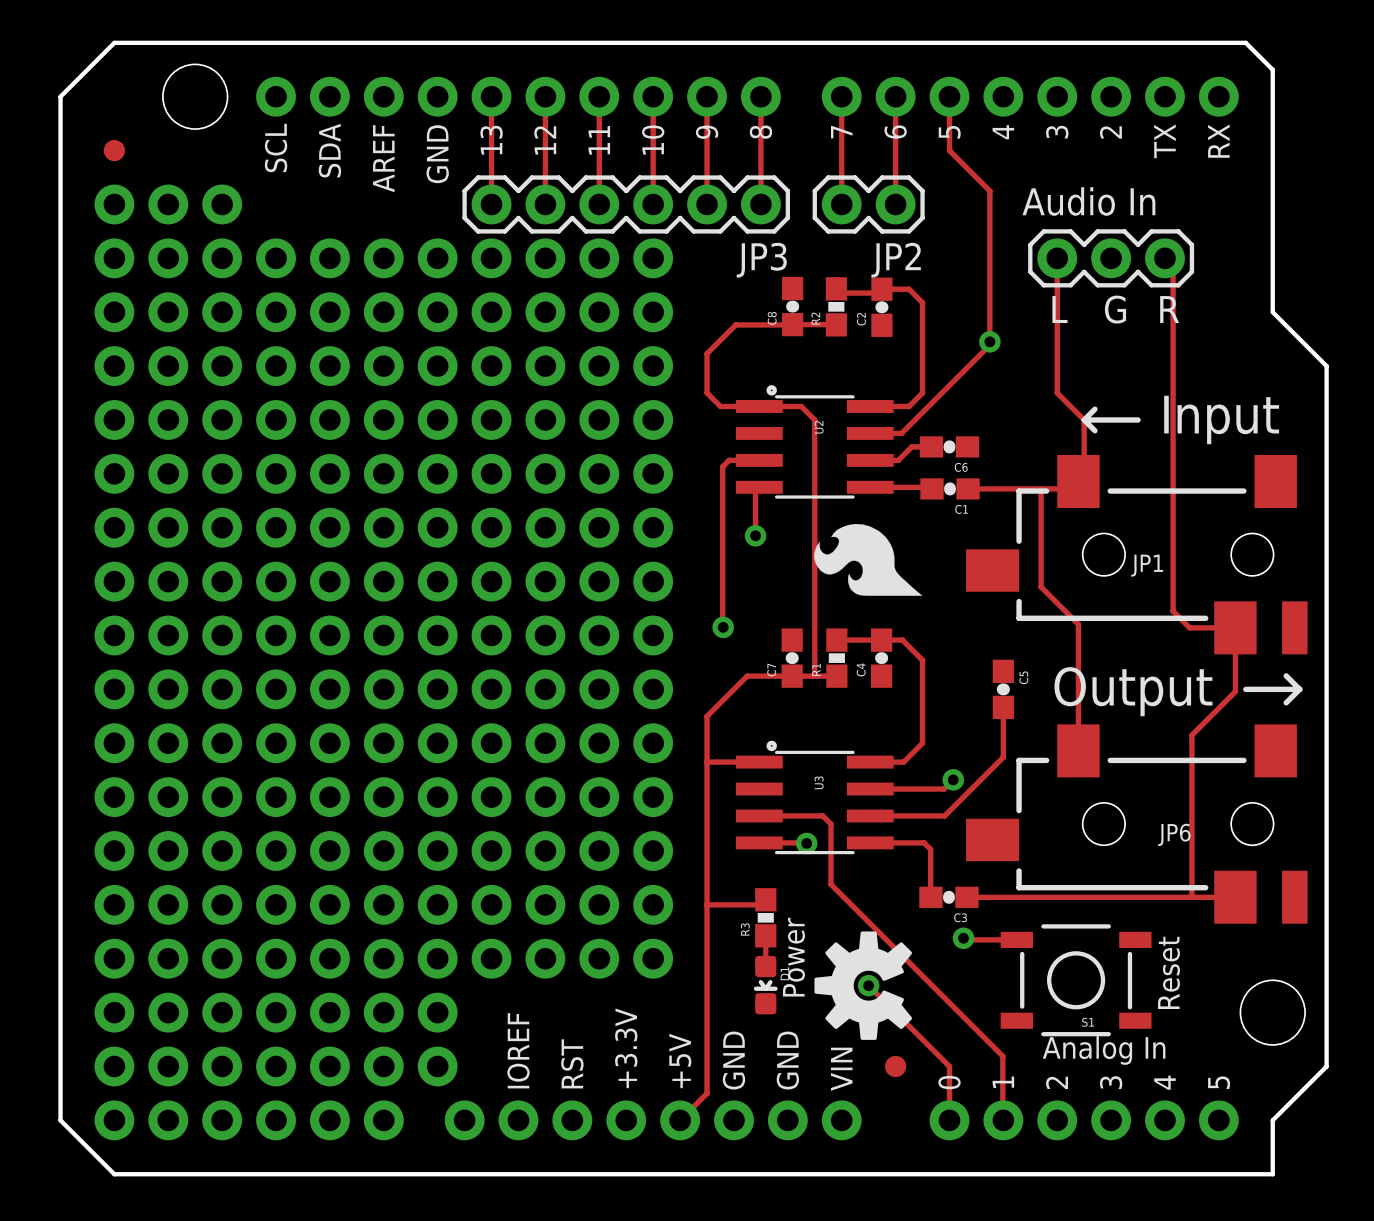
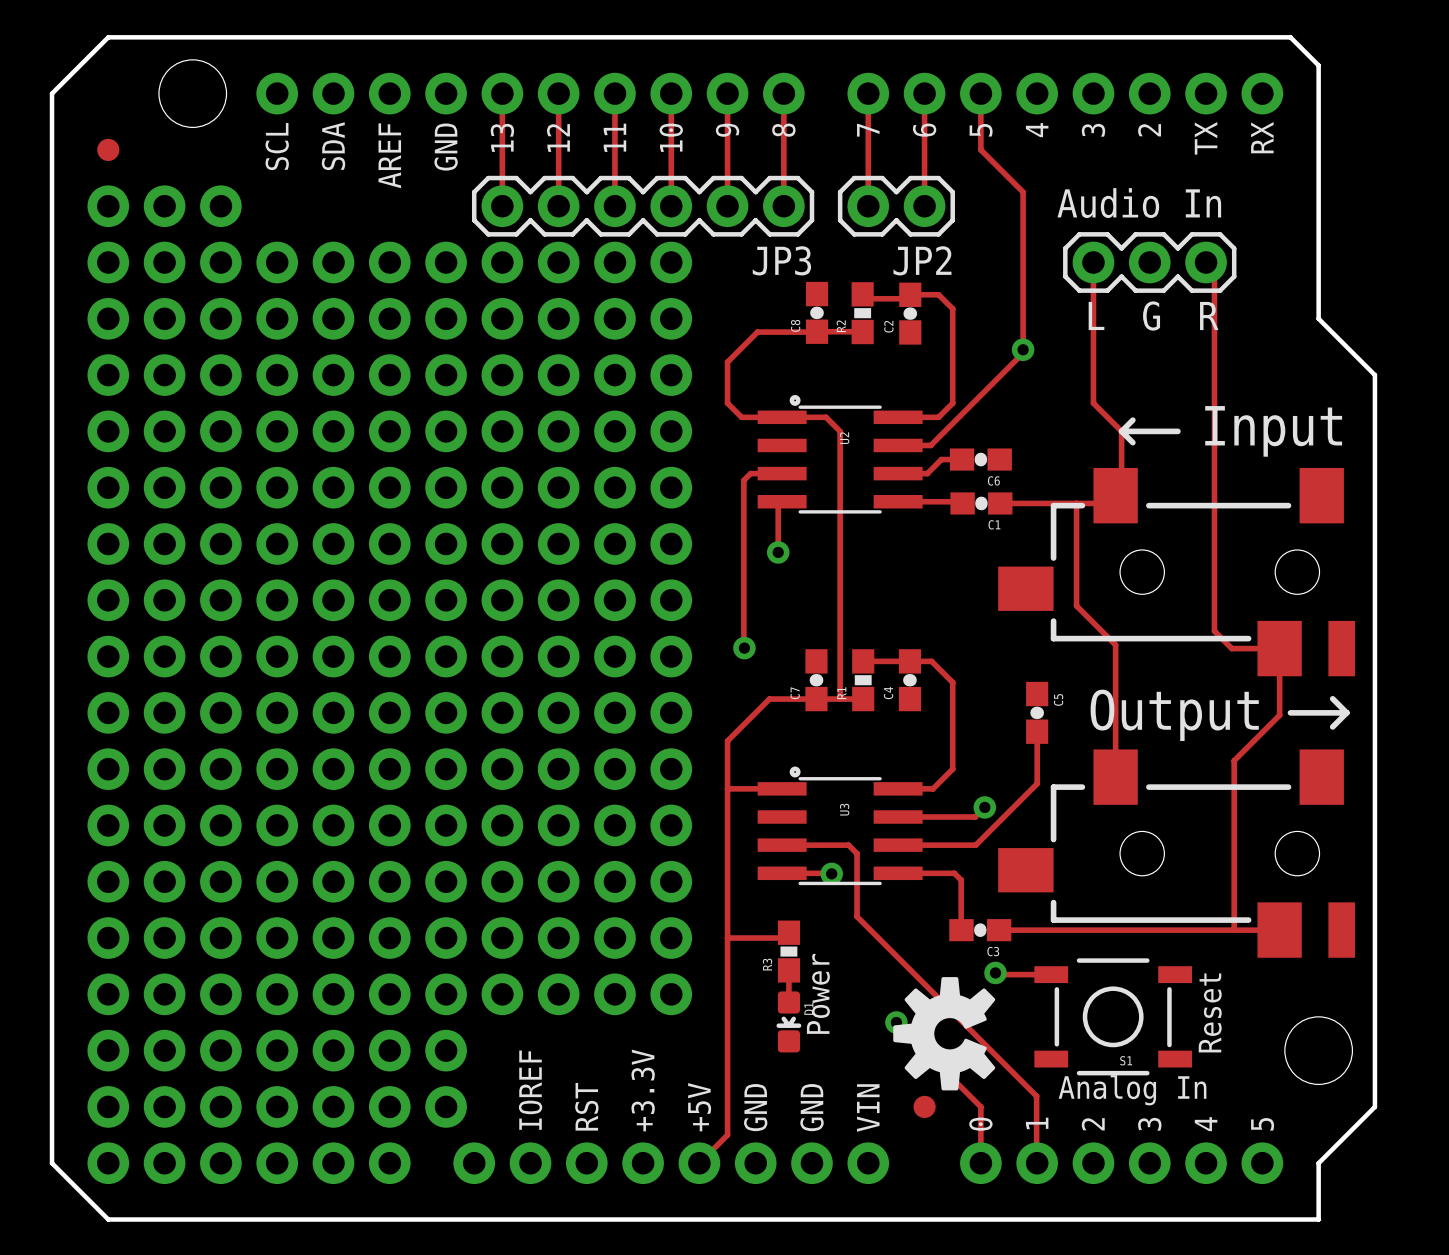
drawing: [814, 523, 923, 596] -> none
JP1 name: JP1 (1147, 565) -> none
JP6 name: JP6 (1174, 834) -> none
drawing position: (863, 985) -> (944, 1033)

